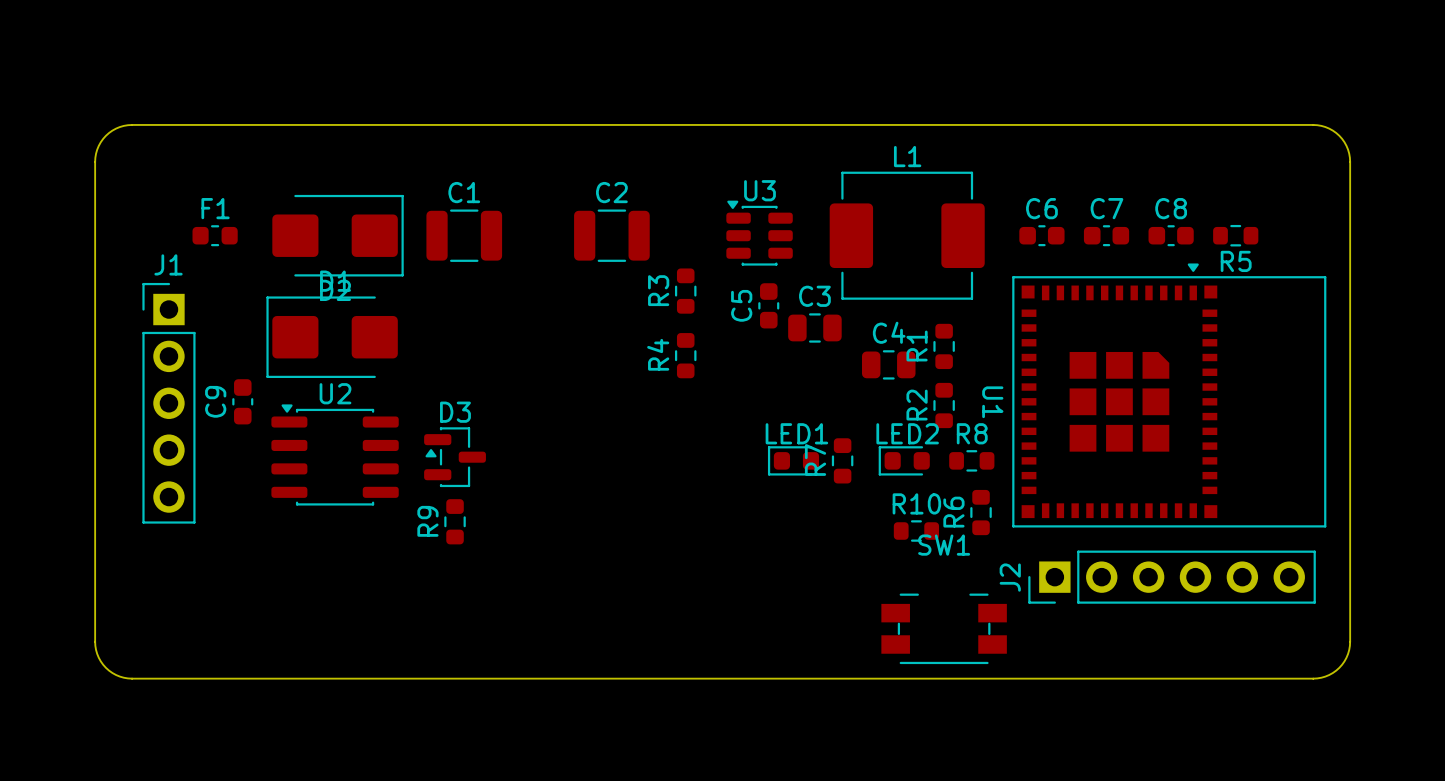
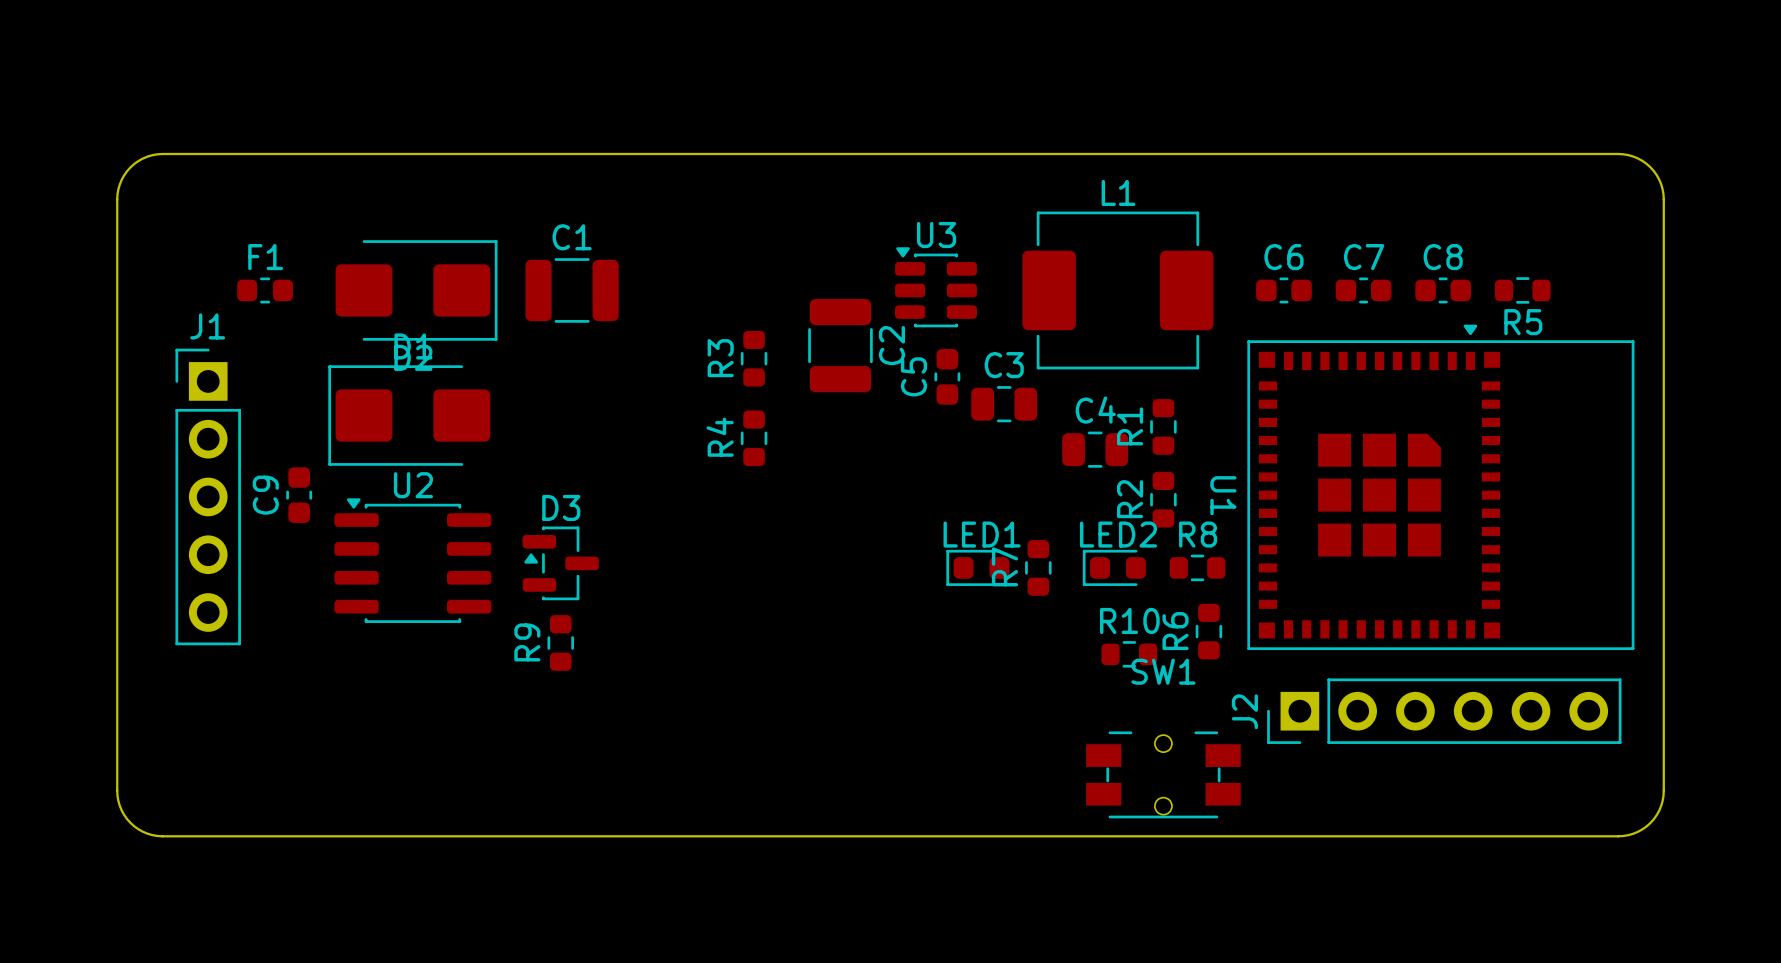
C2 rotation: 0° (611, 235) -> 90° clockwise (840, 345)
C2 position: (611, 235) -> (840, 345)
R3 position: (685, 291) -> (754, 358)
R4 position: (685, 355) -> (754, 438)
SW1 footprint: [881, 593, 1007, 665] -> [1086, 731, 1241, 819]

